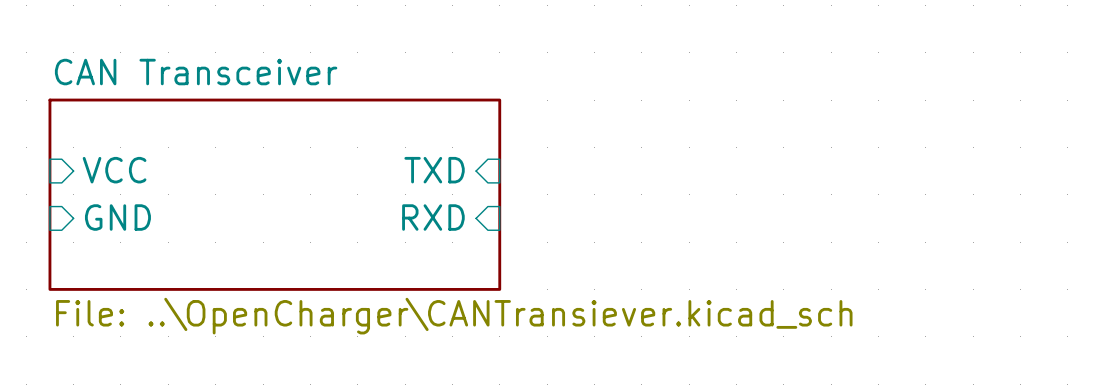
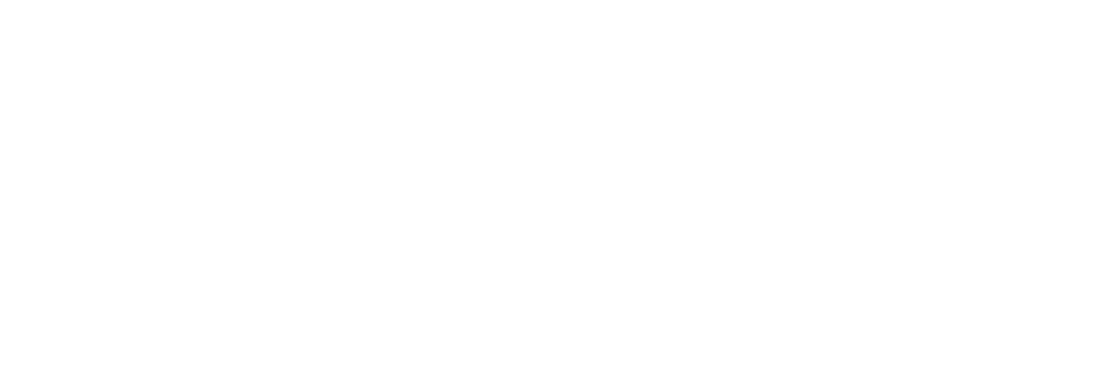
sheet pin: VCC (114, 170) -> none
sheet pin: TXD (434, 170) -> none
sheet CAN Transceiver: File: ..\OpenCharger\CANTransiever.kicad_sch (274, 194) -> none
sheet pin: GND (117, 217) -> none
sheet pin: RXD (433, 217) -> none

